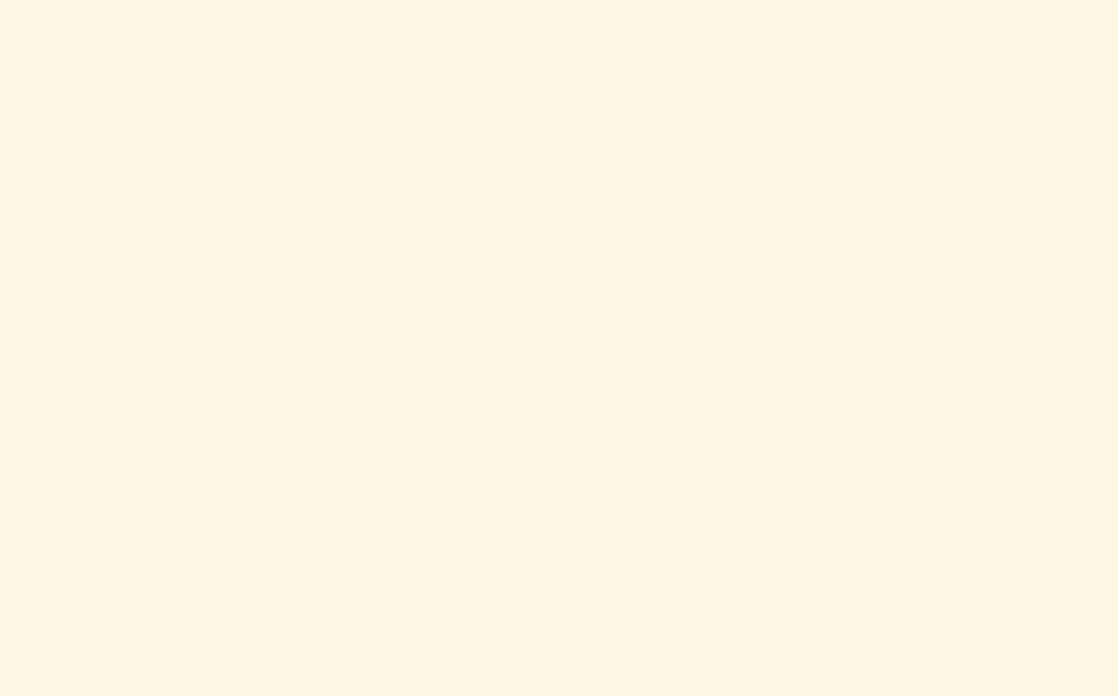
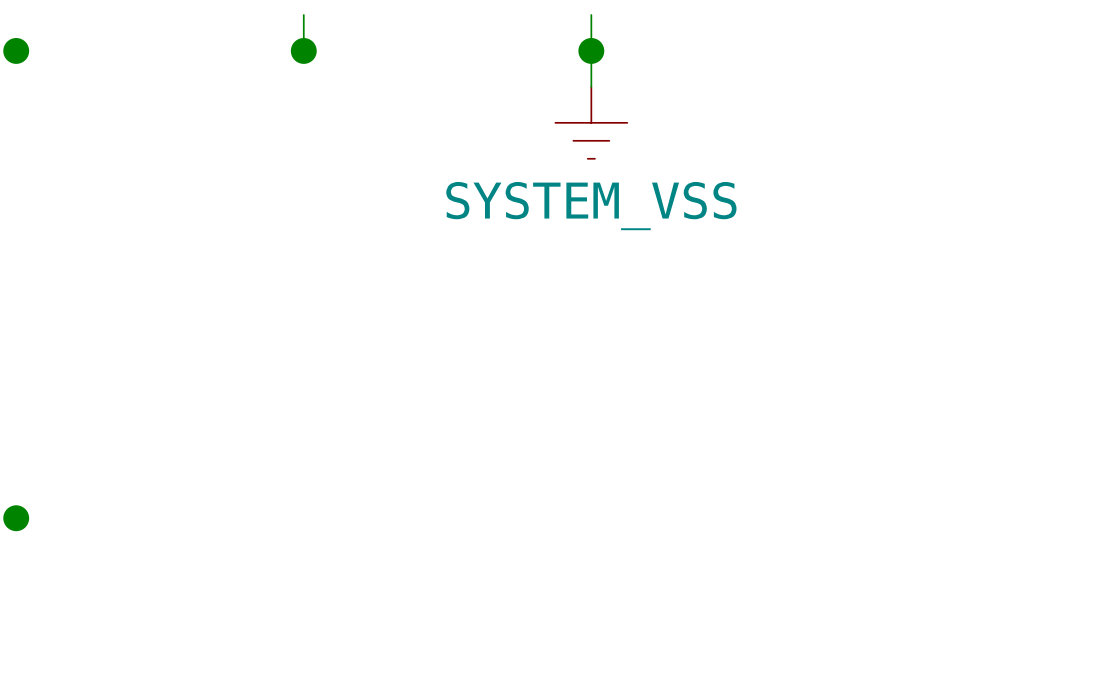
wire: none -> (303, 15) (303, 50)
wire: none -> (591, 15) (591, 86)
junction: none -> (16, 50)
junction: none -> (303, 50)
junction: none -> (591, 50)
power symbol: none -> SYSTEM_VSS (591, 122)
junction: none -> (16, 518)

